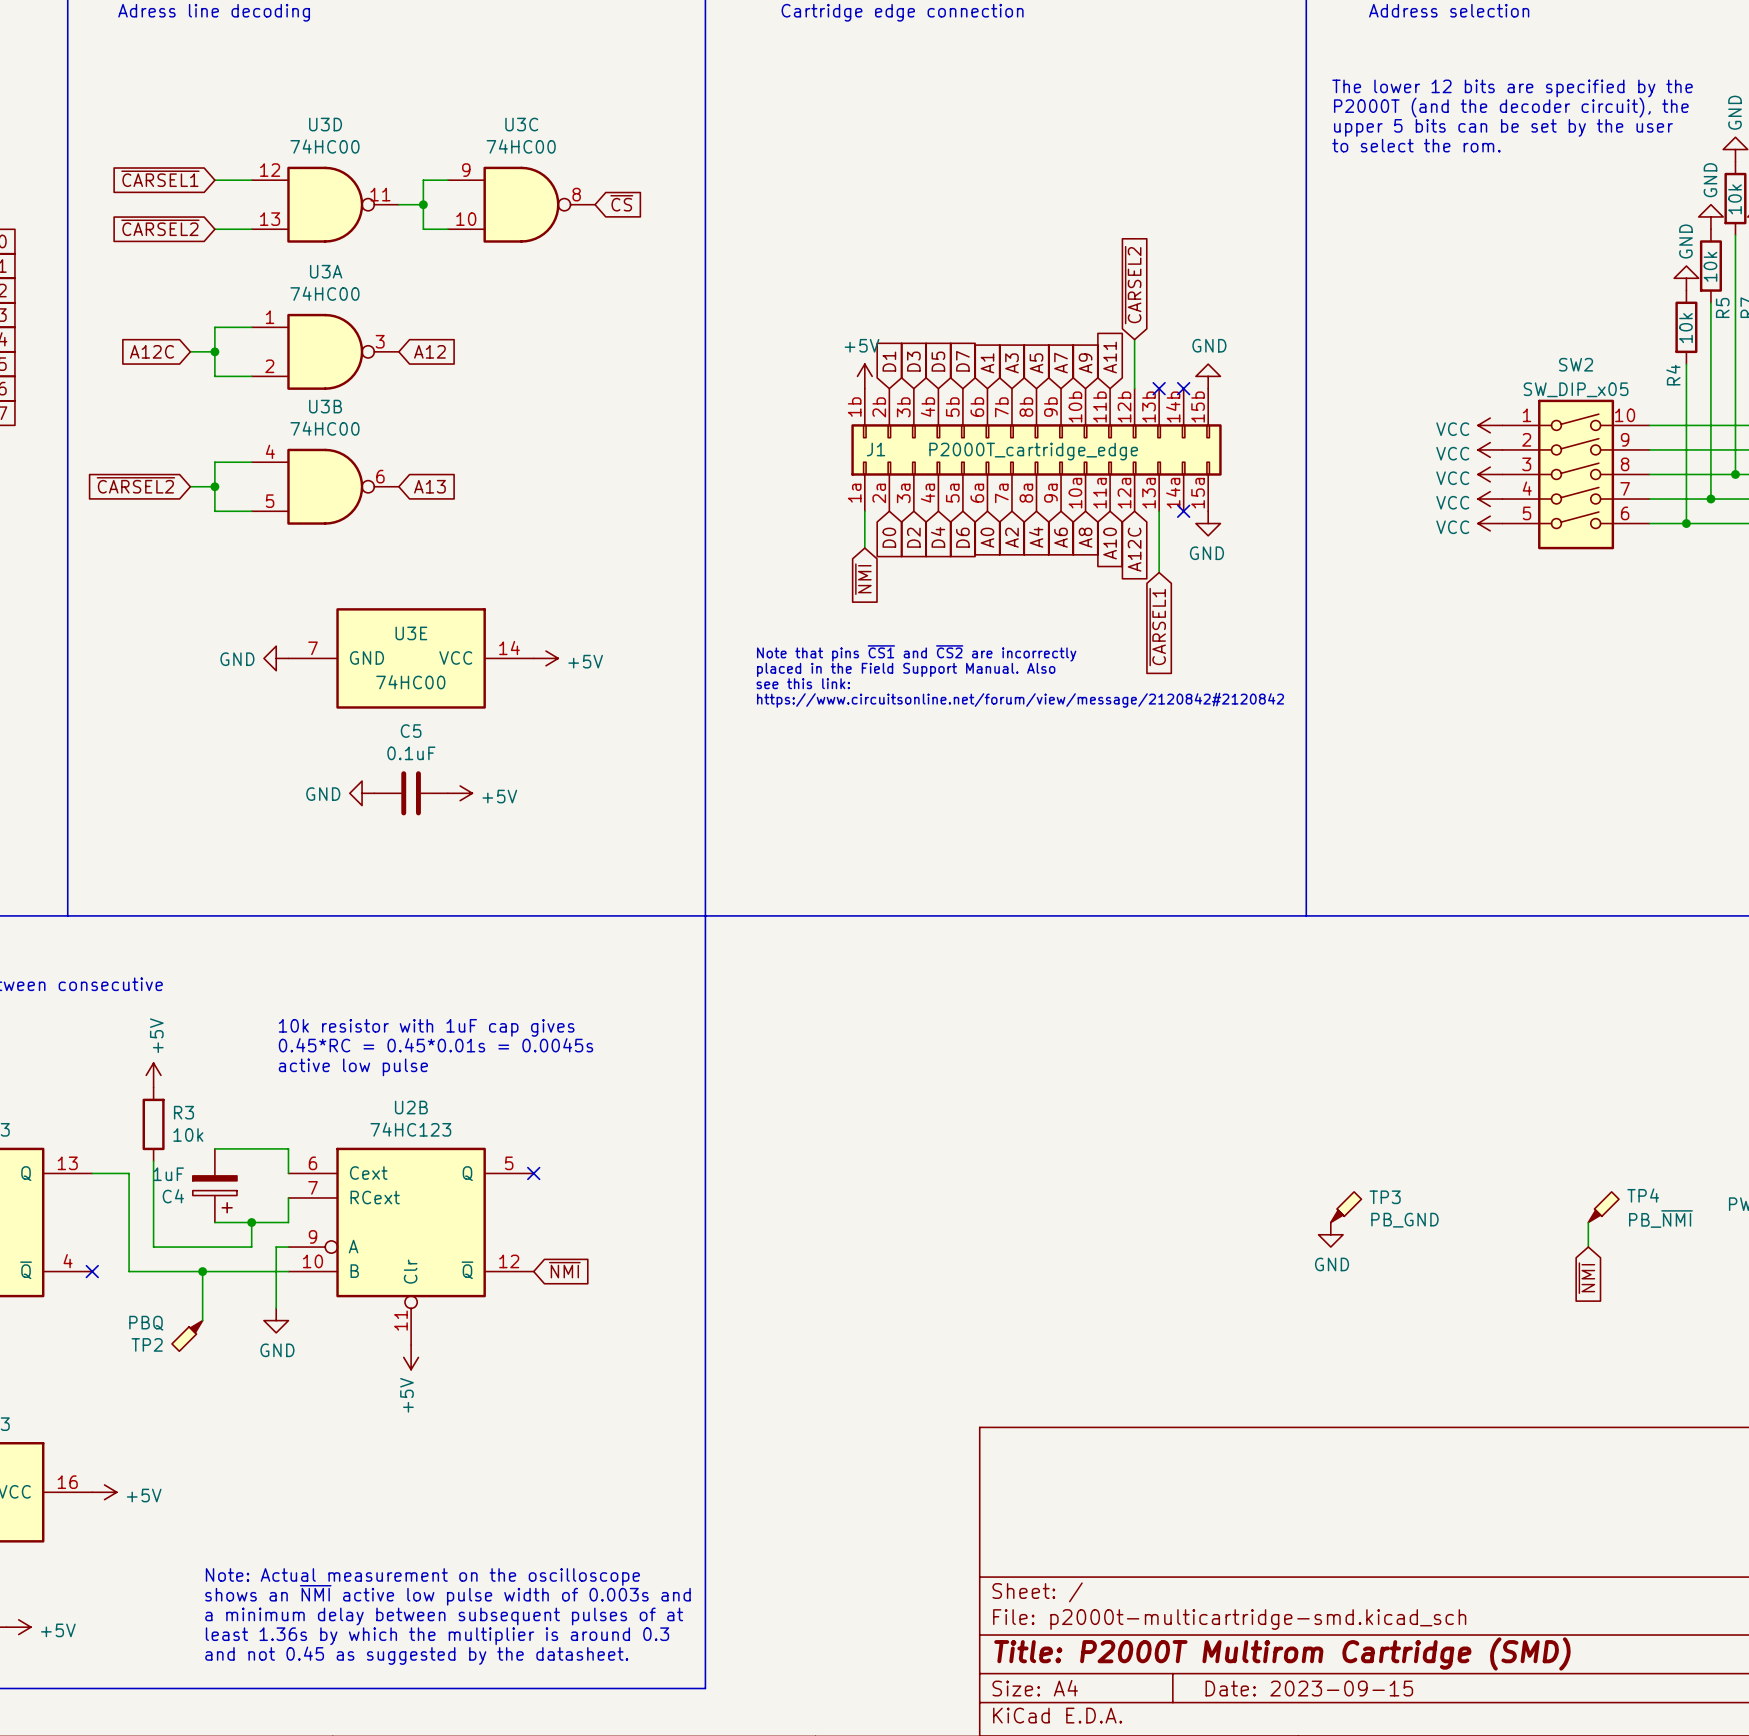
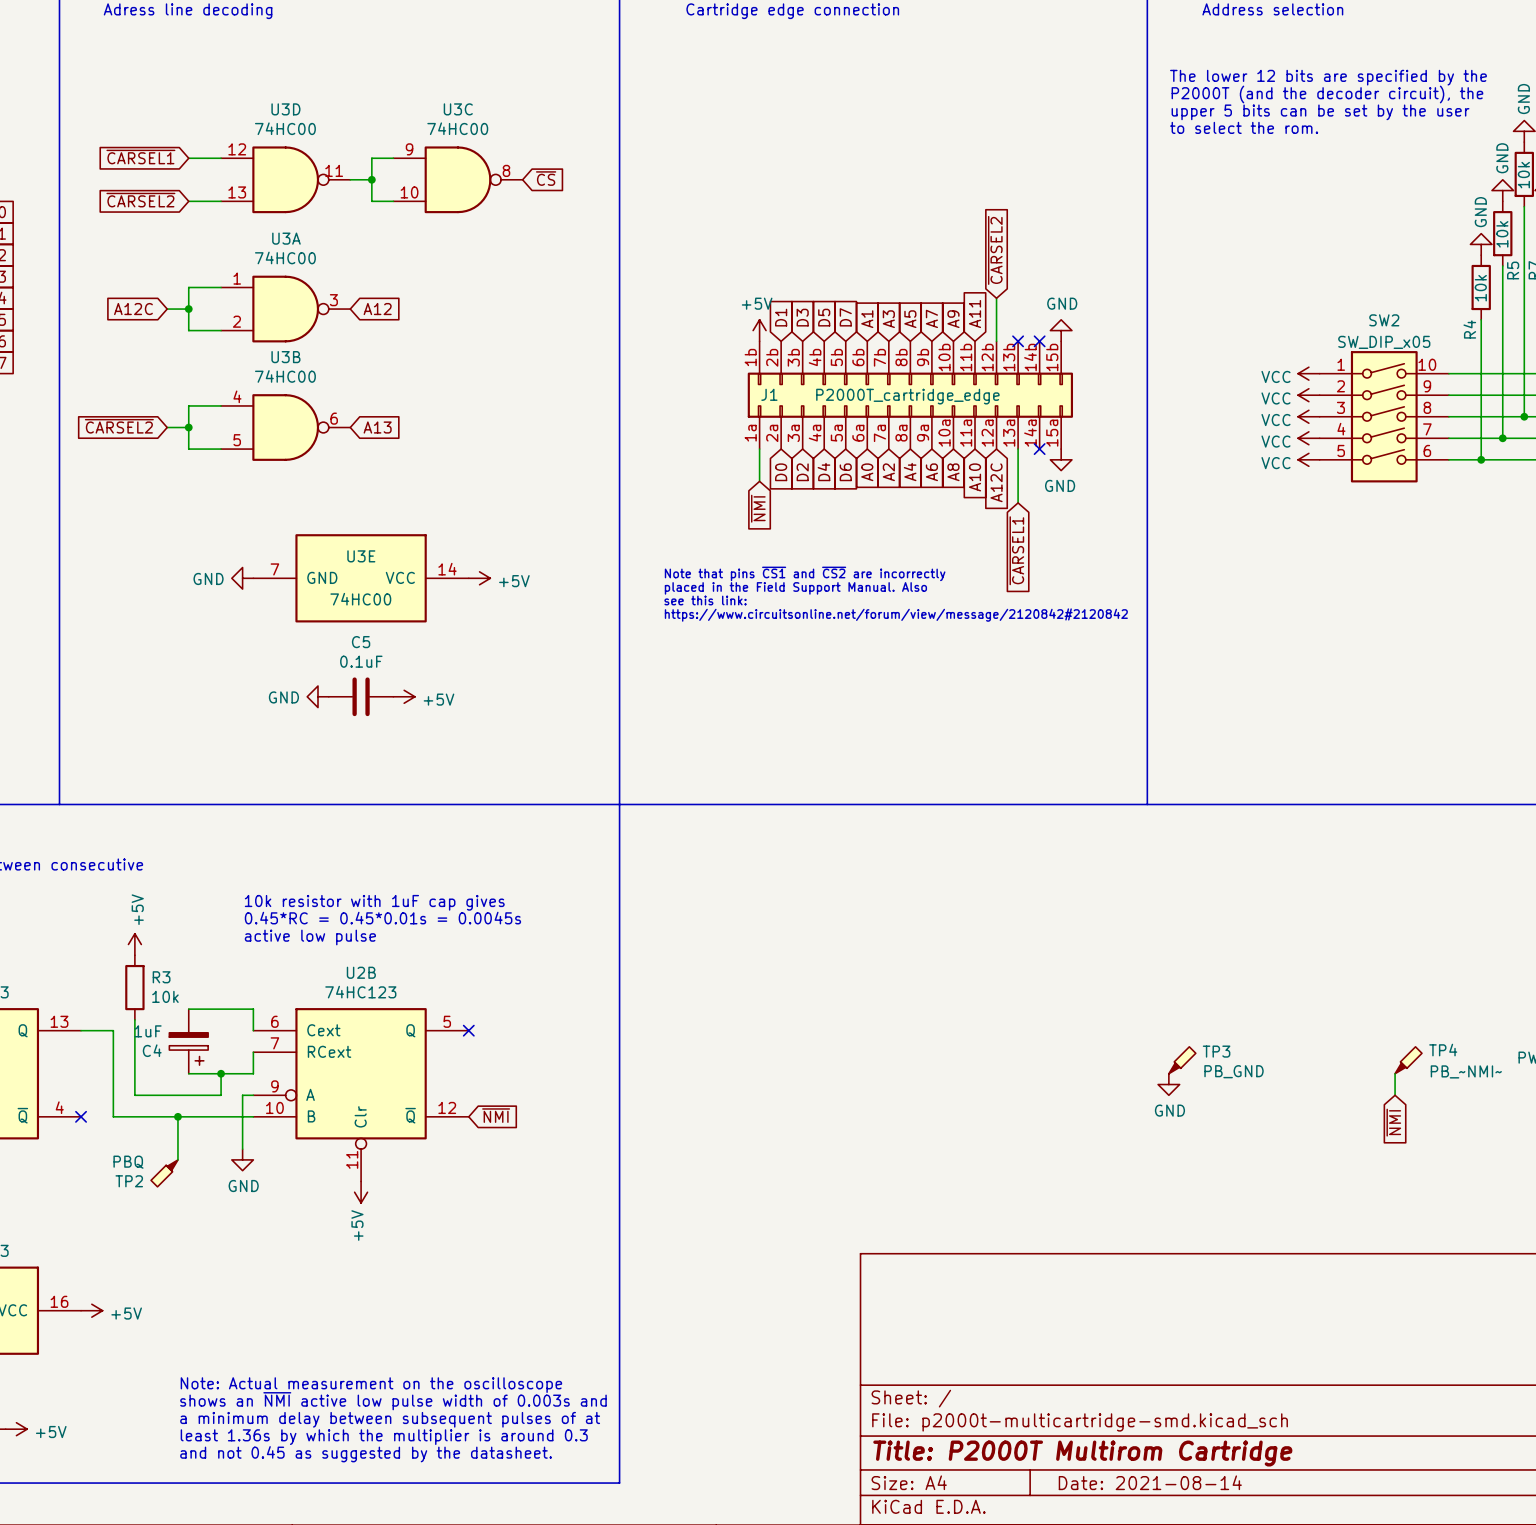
TP4 value: PB_~{NMI} (1660, 1219) -> PB_~NMI~ (1466, 1071)
title block: Title: P2000T Multirom Cartridge (SMD) (1282, 1653) -> Title: P2000T Multirom Cartridge (1082, 1453)
title block: Date: 2023-09-15 (1309, 1688) -> Date: 2021-08-14 (1150, 1482)

